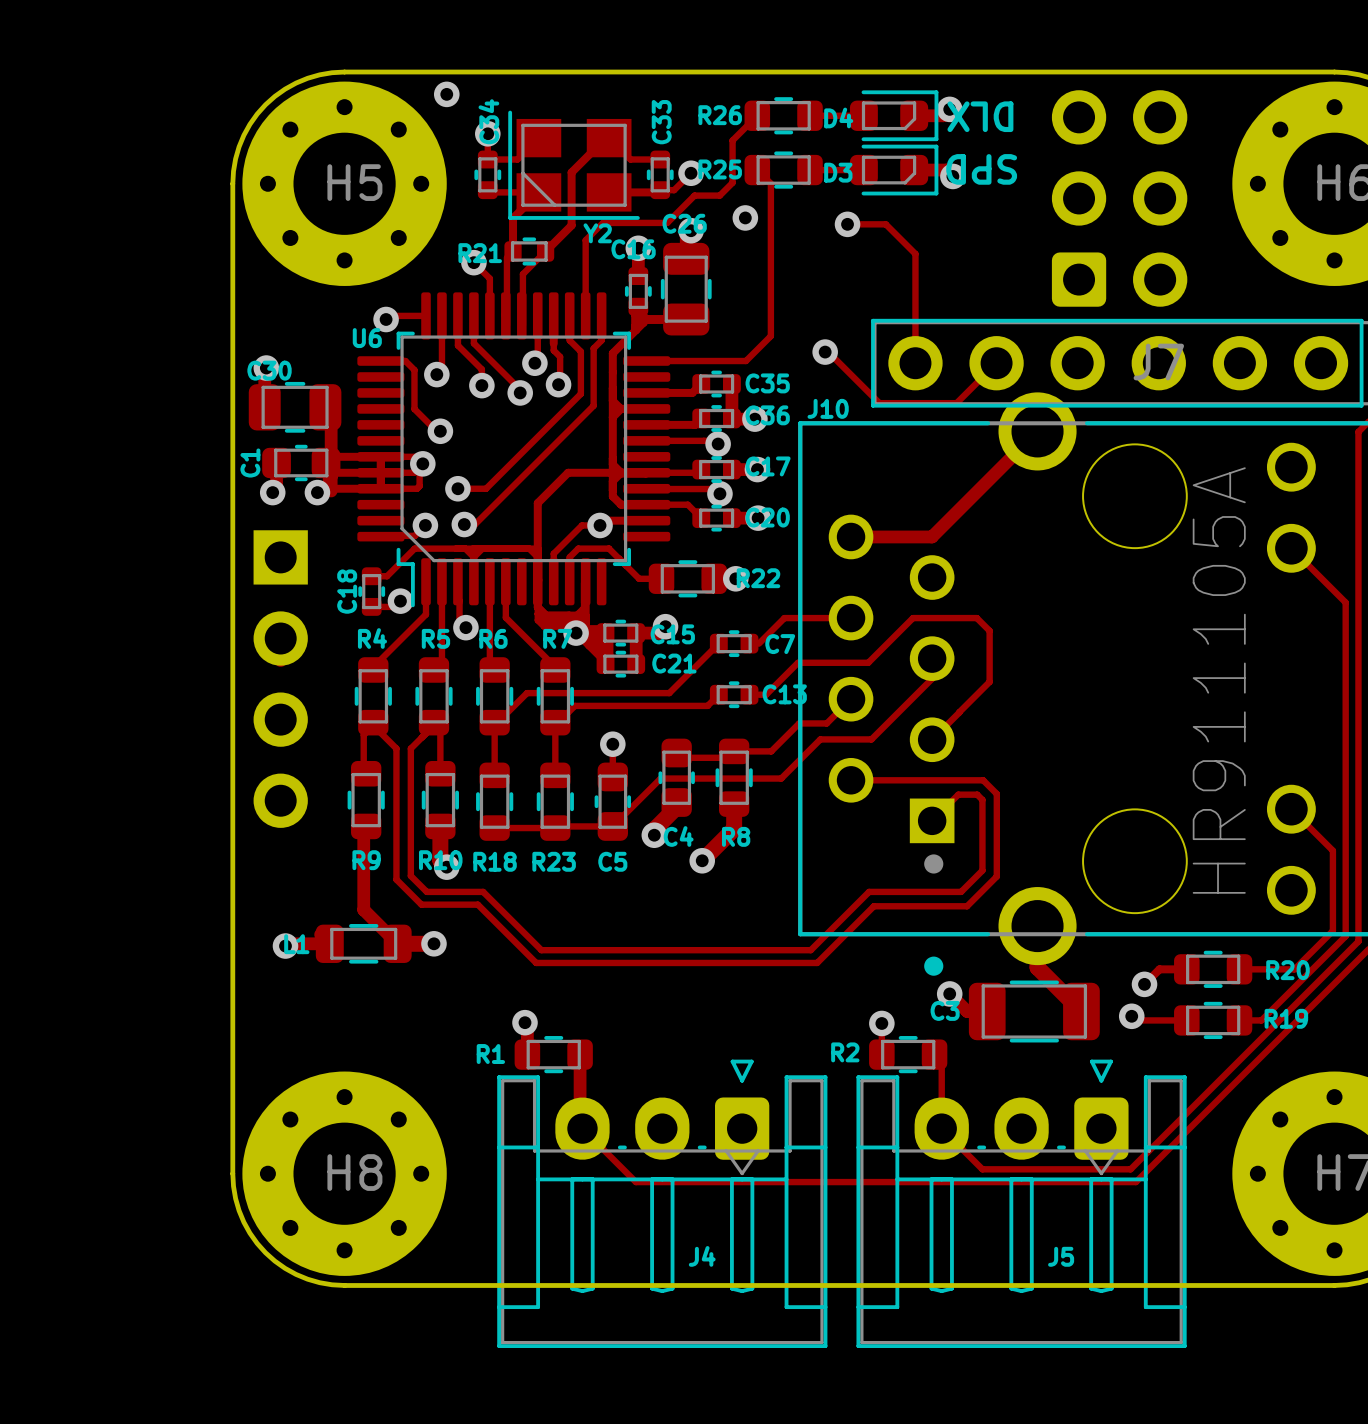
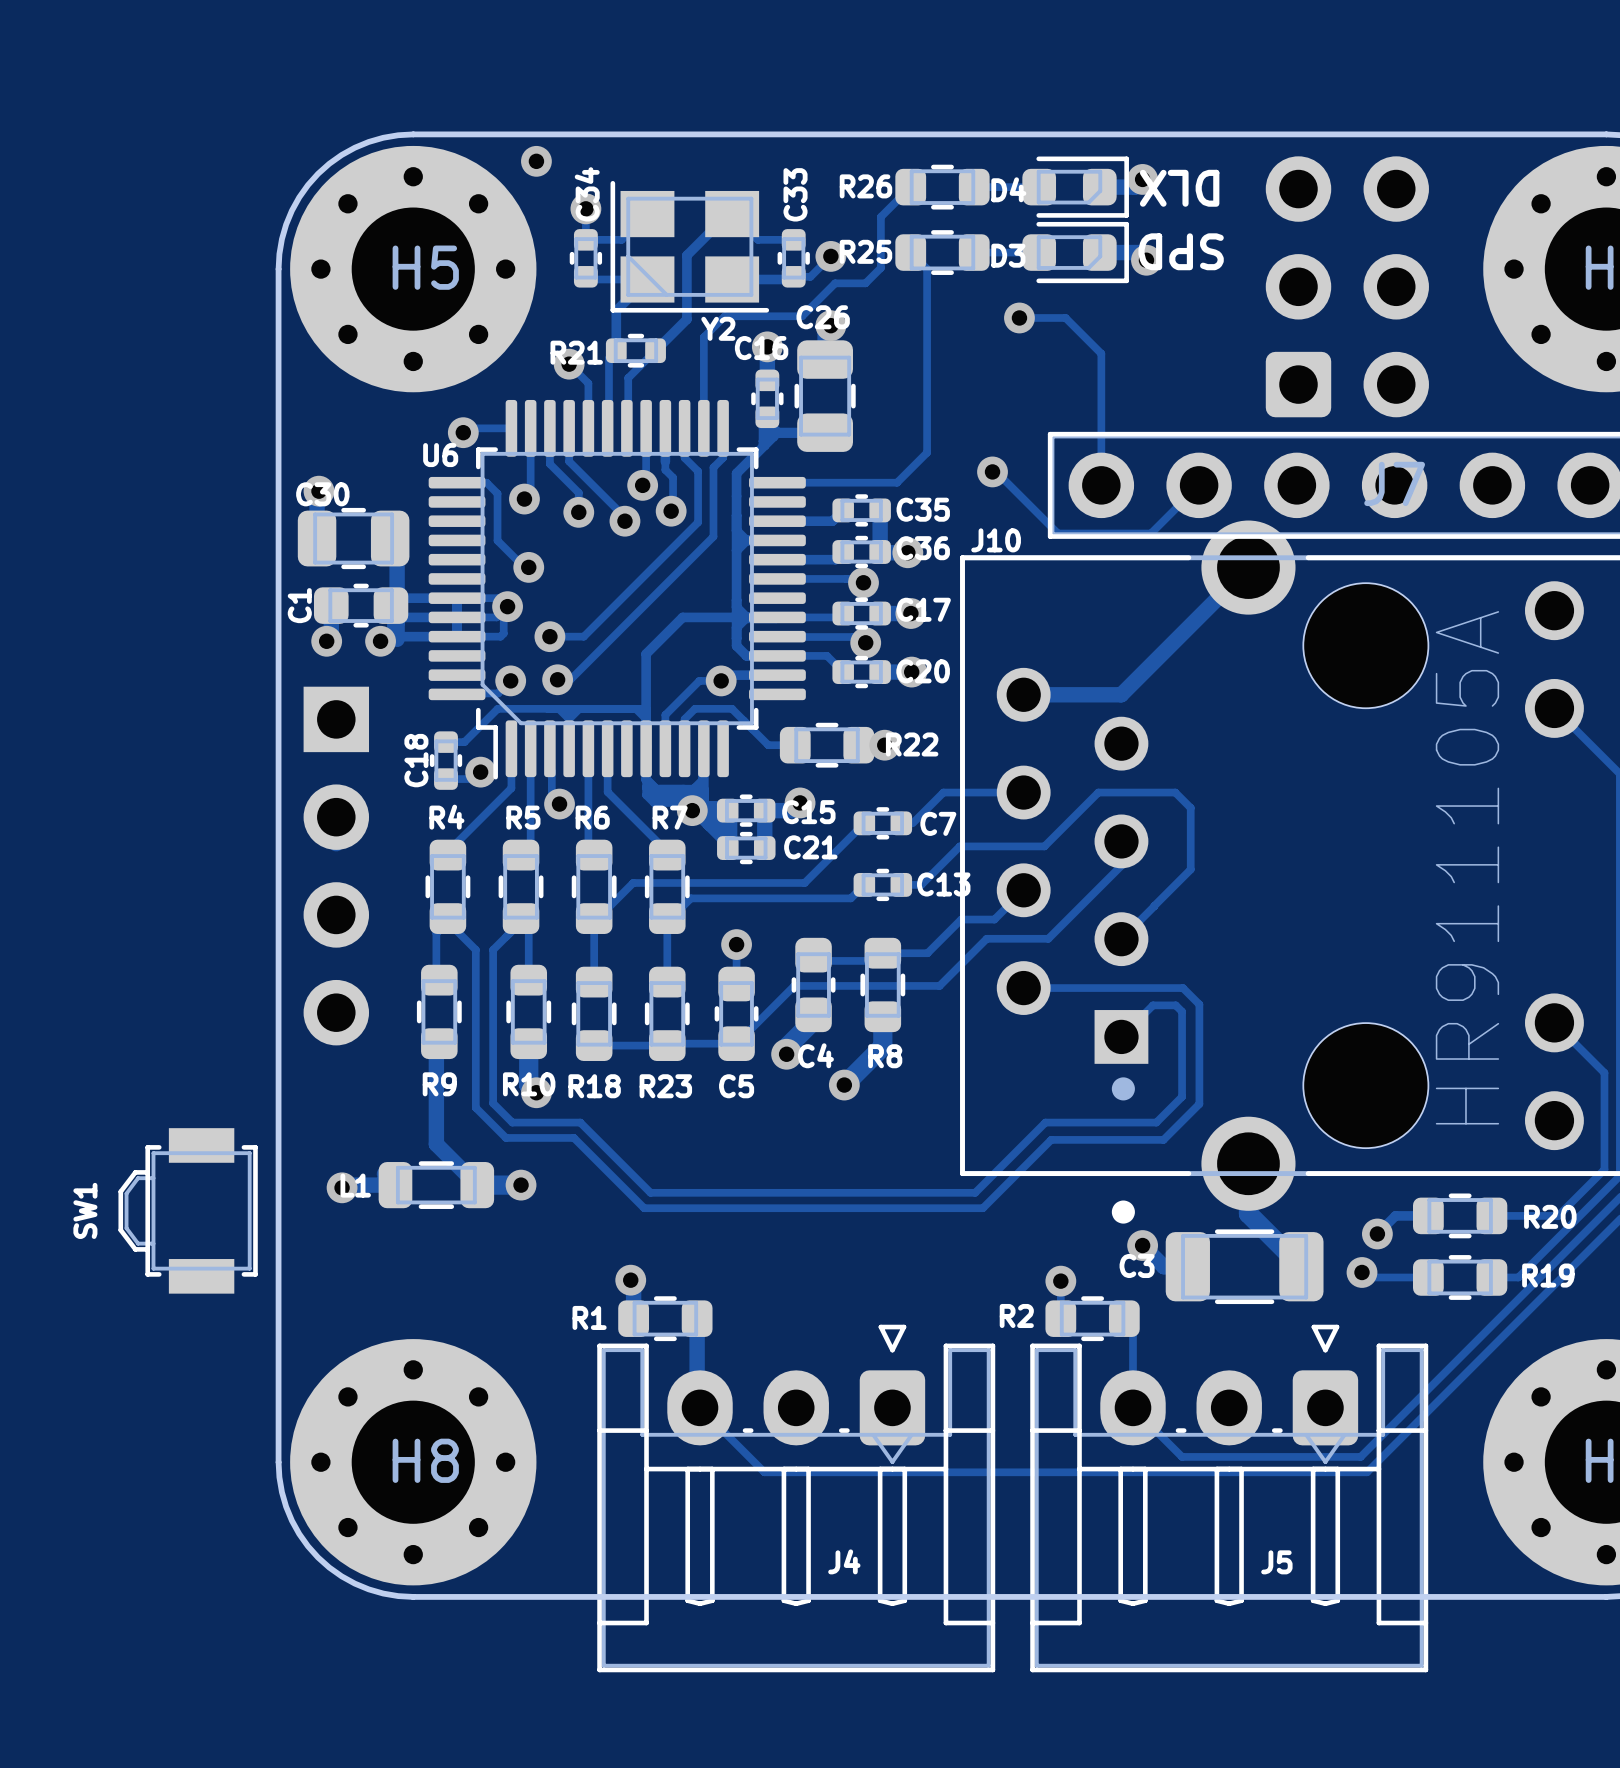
via: (745, 217) -> none
SW1: none -> (188, 1210)

